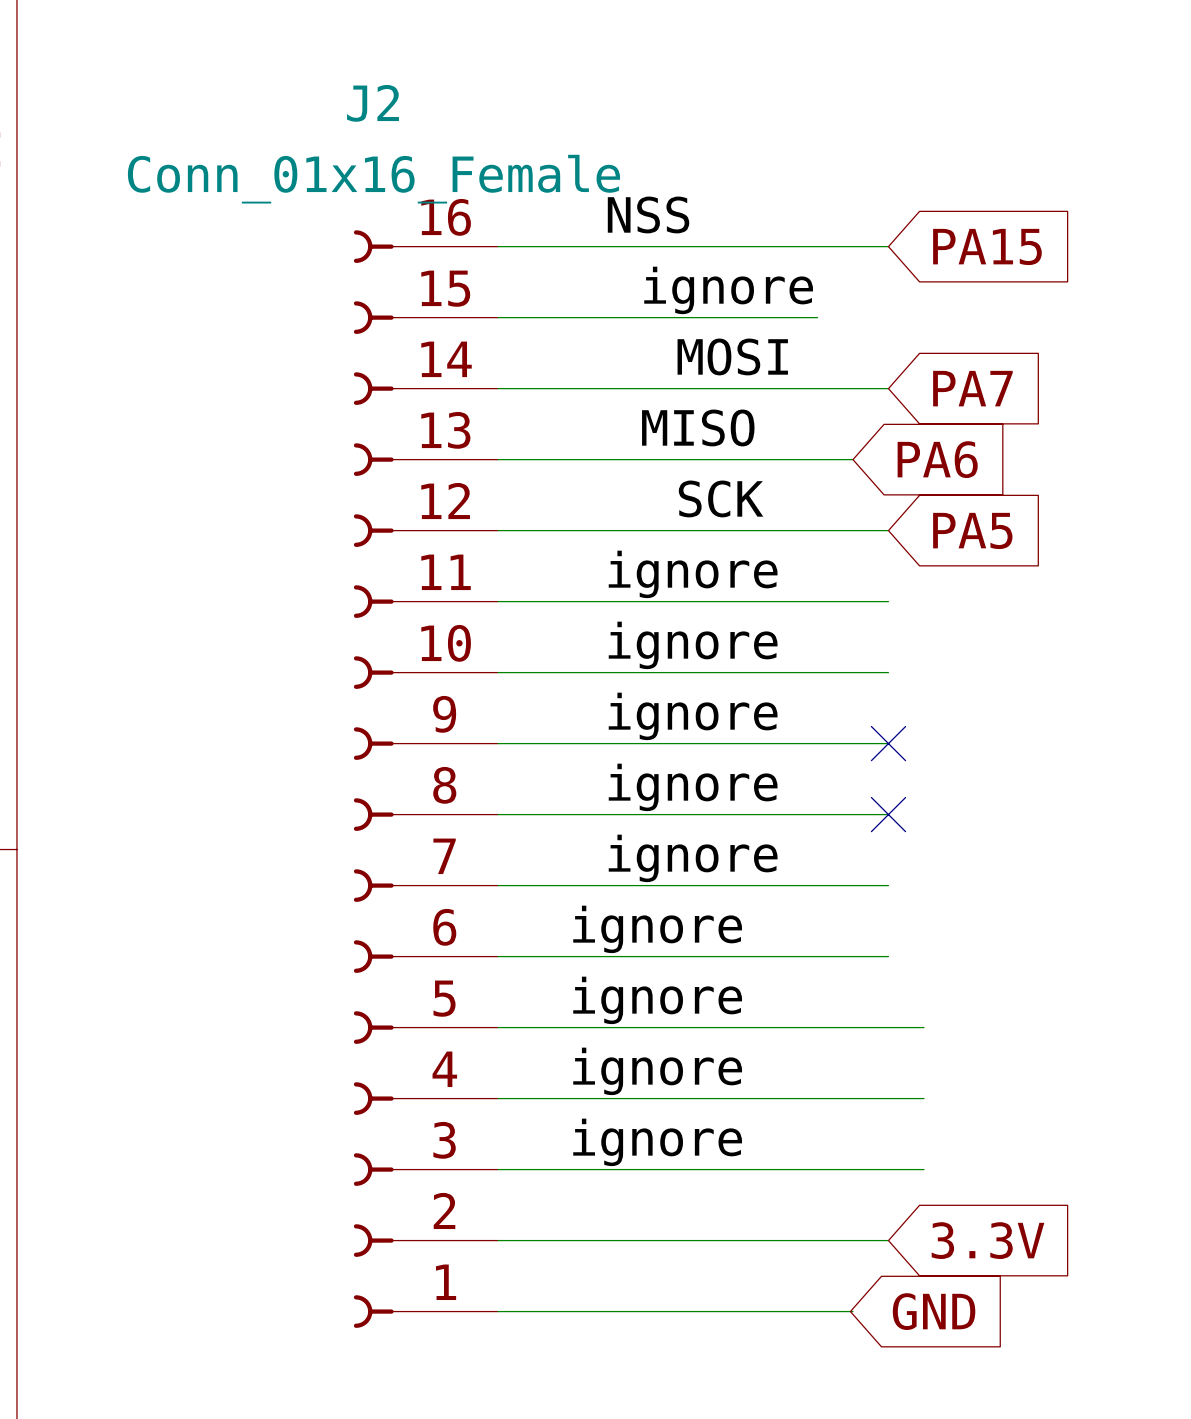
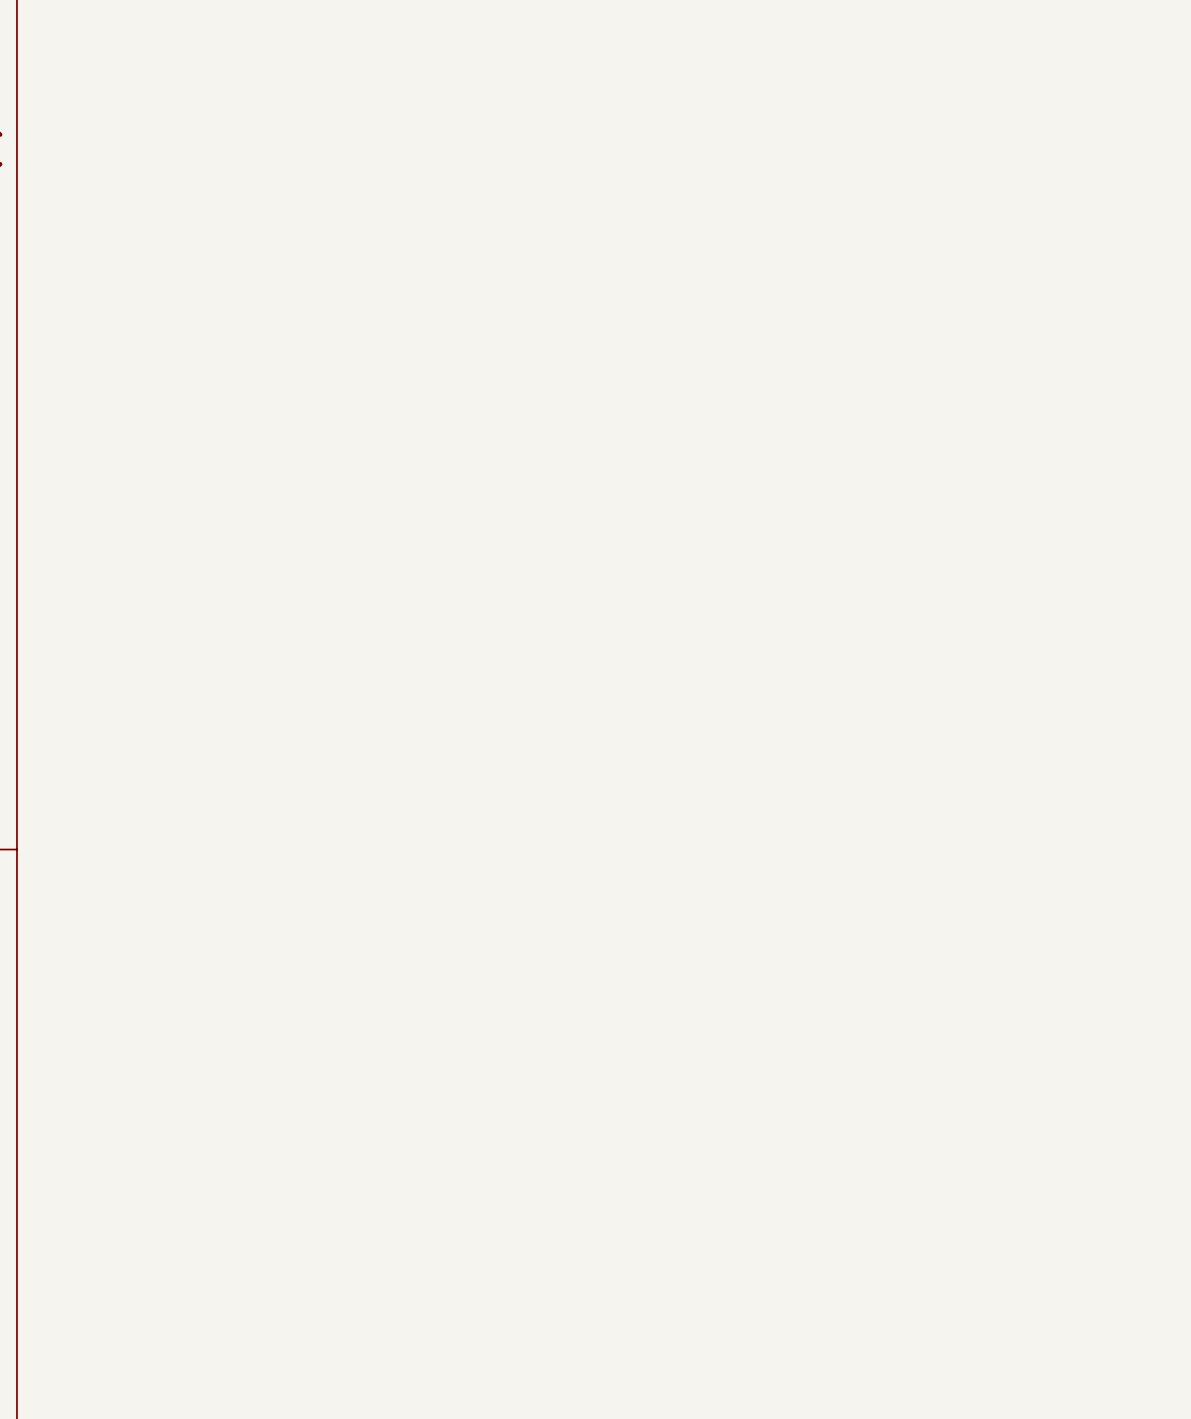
label: NSS (648, 214) -> none
wire: (498, 246) (888, 246) -> none
global label: PA15 (987, 246) -> none
label: ignore (728, 290) -> none
wire: (498, 317) (817, 317) -> none
label: MOSI (732, 356) -> none
wire: (498, 388) (888, 388) -> none
global label: PA7 (972, 388) -> none
label: MISO (698, 427) -> none
wire: (498, 459) (853, 459) -> none
global label: PA6 (937, 459) -> none
label: SCK (721, 498) -> none
wire: (498, 530) (888, 530) -> none
global label: PA5 (972, 530) -> none
label: ignore (693, 574) -> none
wire: (498, 601) (888, 601) -> none
label: ignore (693, 645) -> none
wire: (498, 672) (888, 672) -> none
label: ignore (693, 716) -> none
wire: (498, 743) (888, 743) -> none
no-connect mark: (888, 743) -> none
J2: Conn_01x16_Female (425, 779) -> none
label: ignore (693, 787) -> none
wire: (498, 814) (888, 814) -> none
no-connect mark: (888, 814) -> none
label: ignore (693, 858) -> none
wire: (498, 885) (888, 885) -> none
label: ignore (657, 929) -> none
wire: (498, 956) (888, 956) -> none
label: ignore (657, 1000) -> none
wire: (498, 1027) (923, 1027) -> none
label: ignore (657, 1071) -> none
wire: (498, 1098) (923, 1098) -> none
label: ignore (657, 1142) -> none
wire: (498, 1169) (923, 1169) -> none
wire: (498, 1240) (888, 1240) -> none
global label: 3.3V (988, 1240) -> none
wire: (498, 1311) (853, 1311) -> none
global label: GND (934, 1311) -> none

